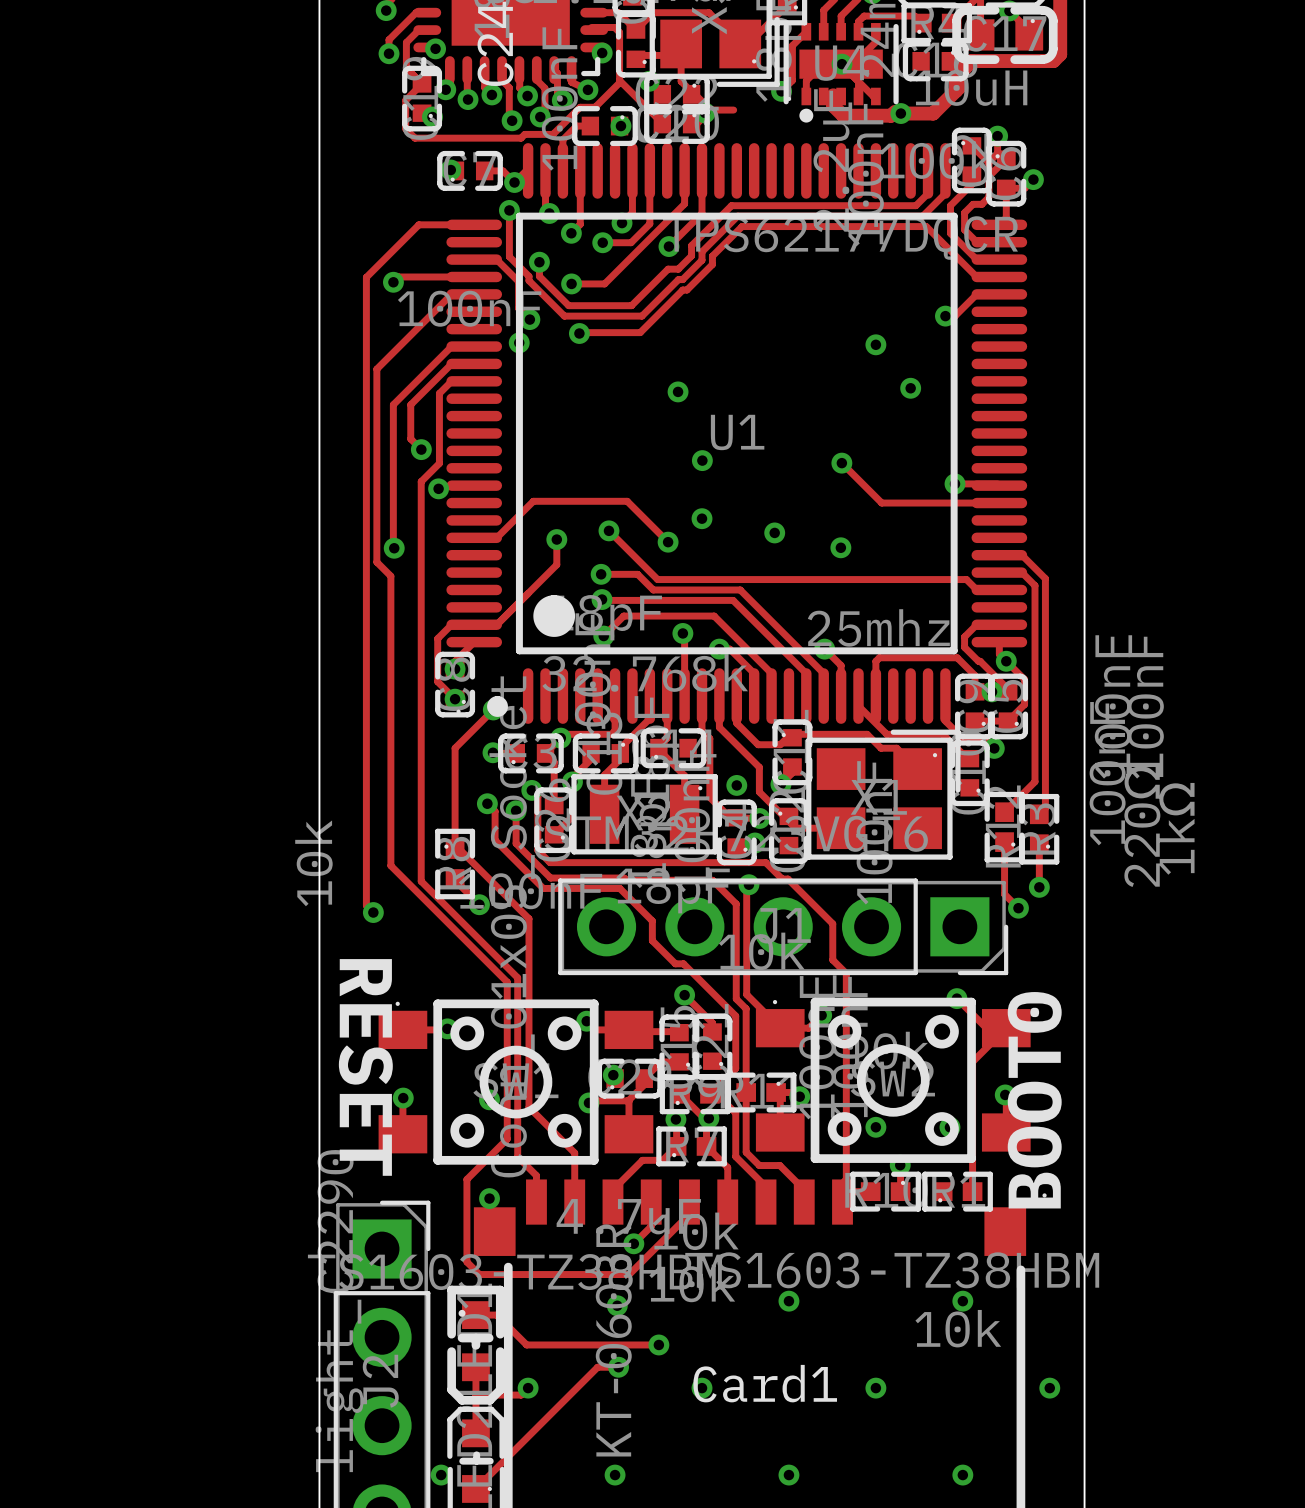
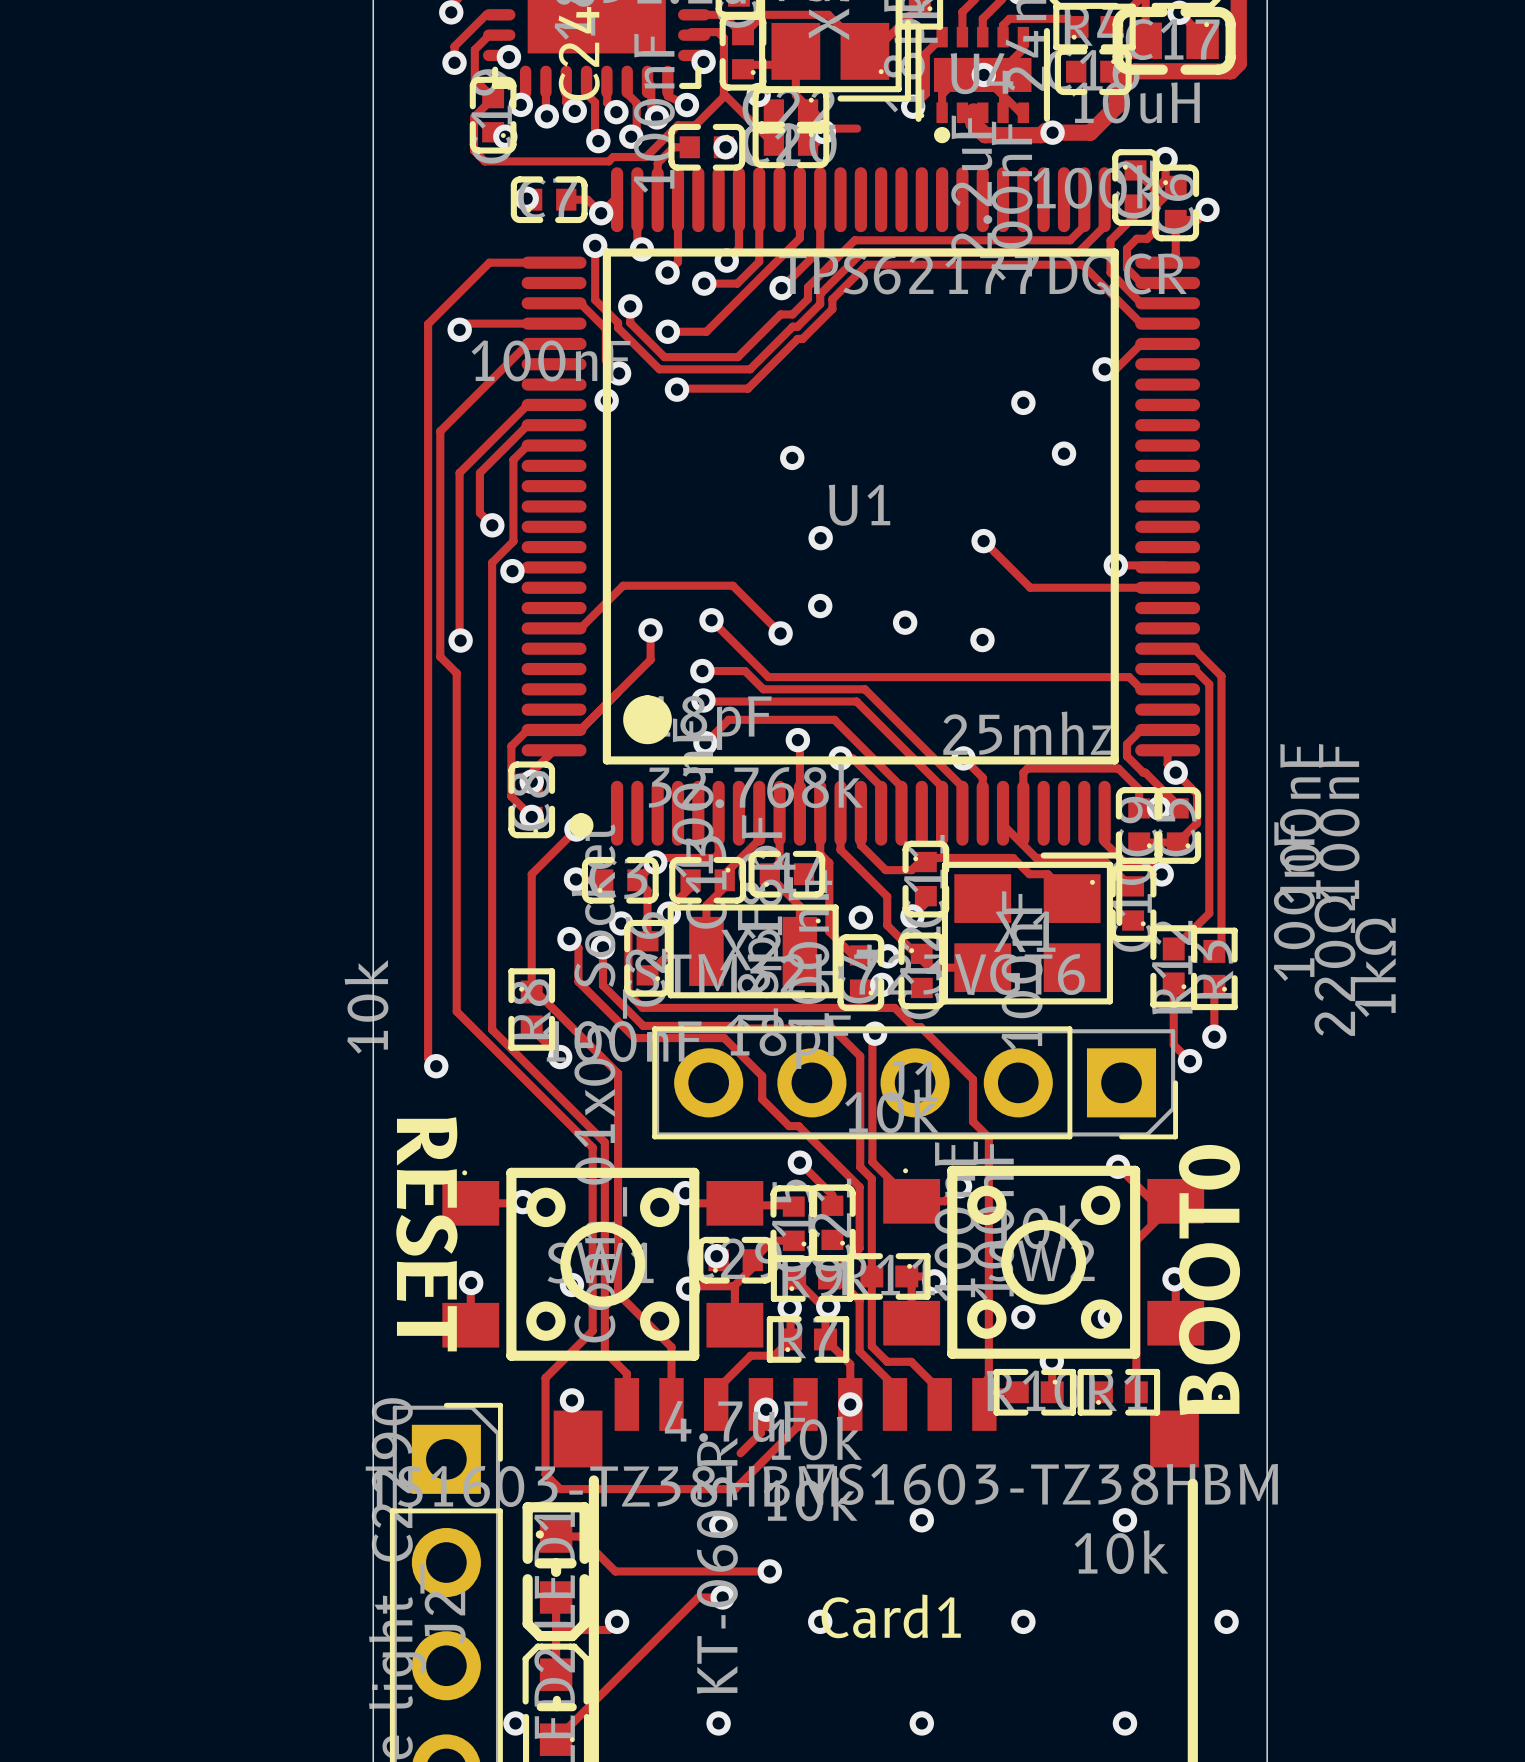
via: none -> (850, 1404)
via position: (633, 1243) -> (766, 1409)

